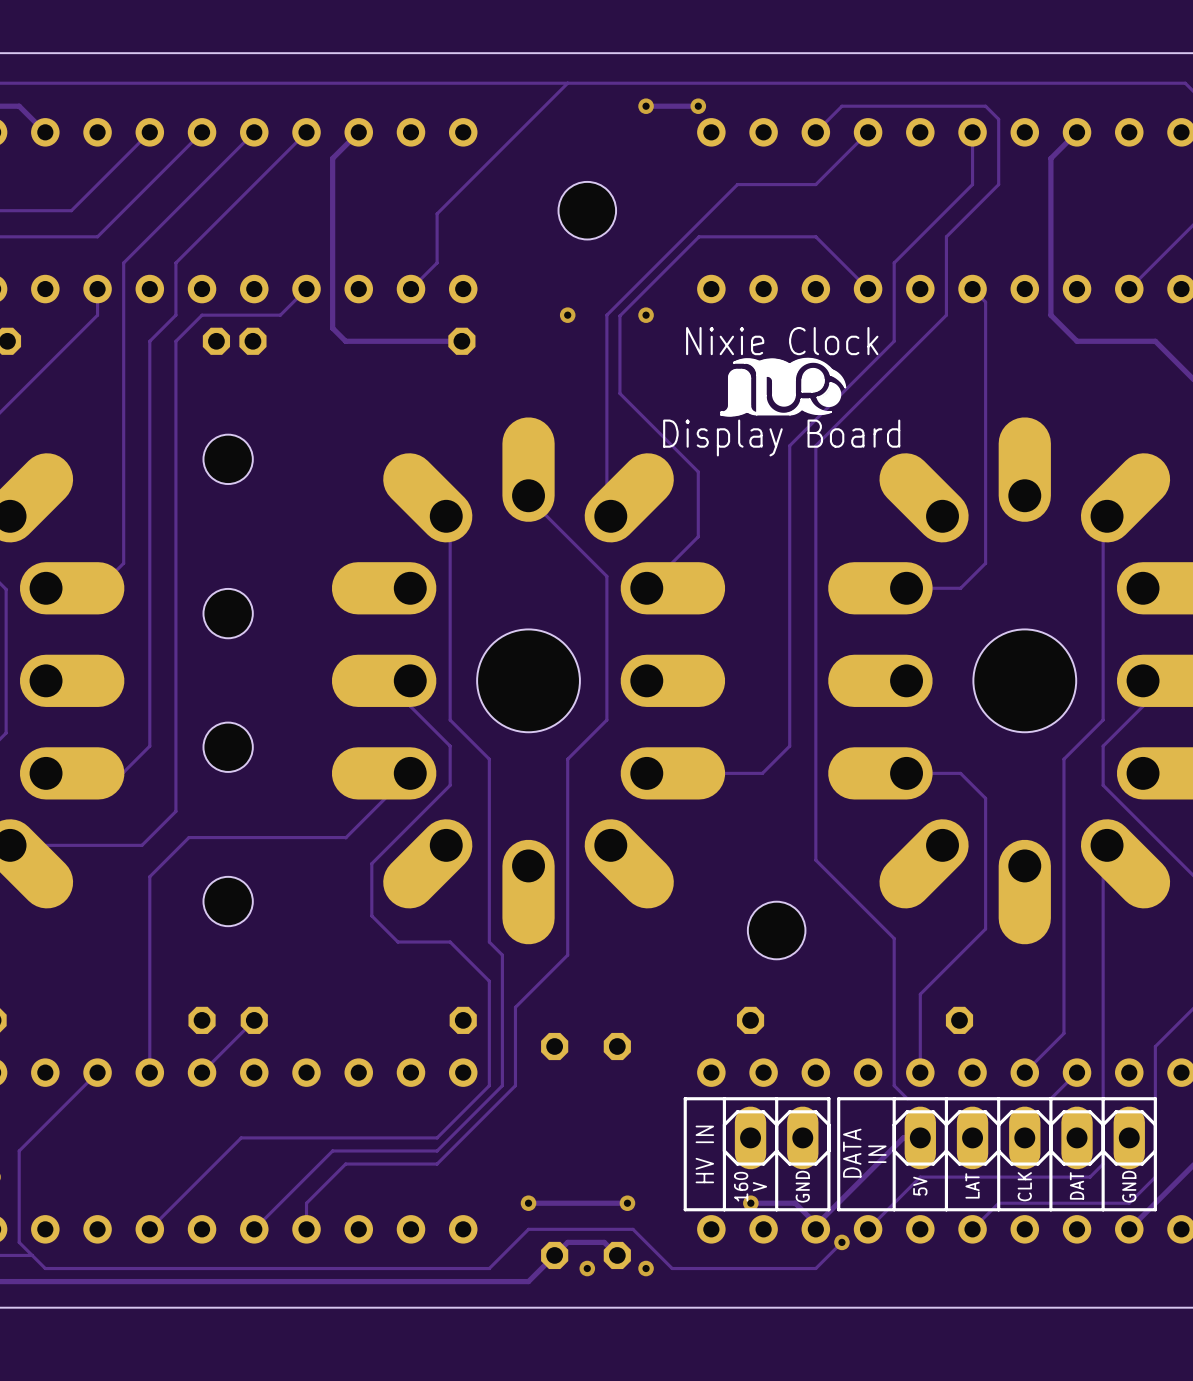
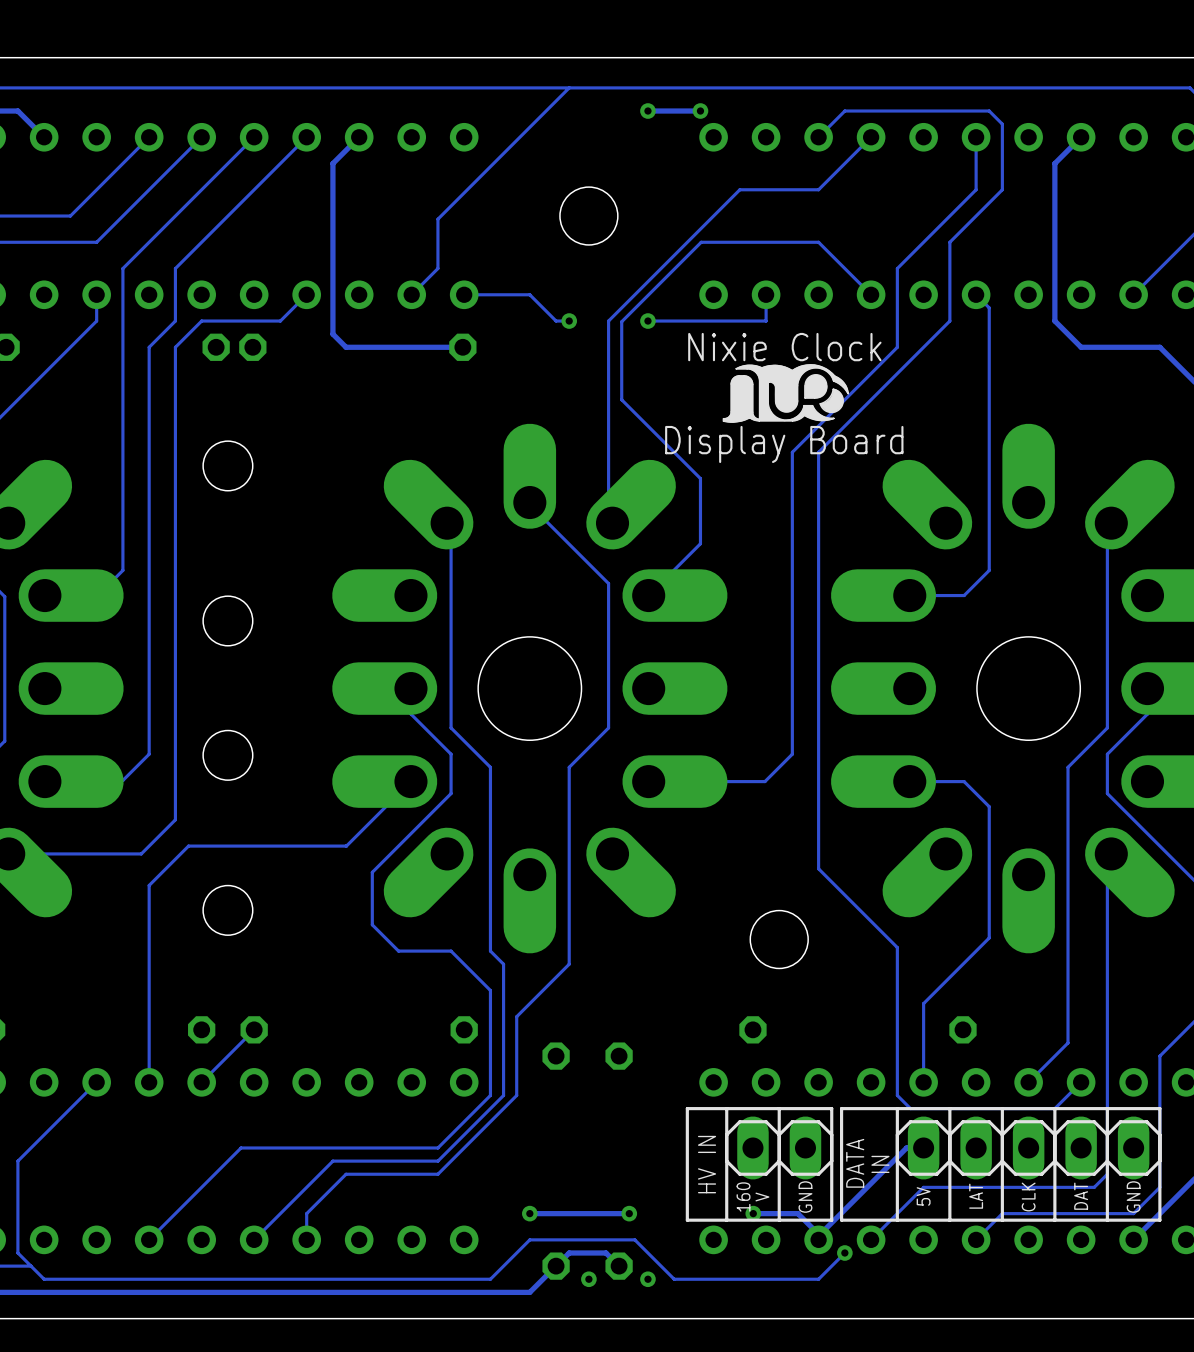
track: none -> (464, 294) (529, 294) (556, 321) (569, 321)
track: none -> (766, 294) (766, 321) (647, 321)

